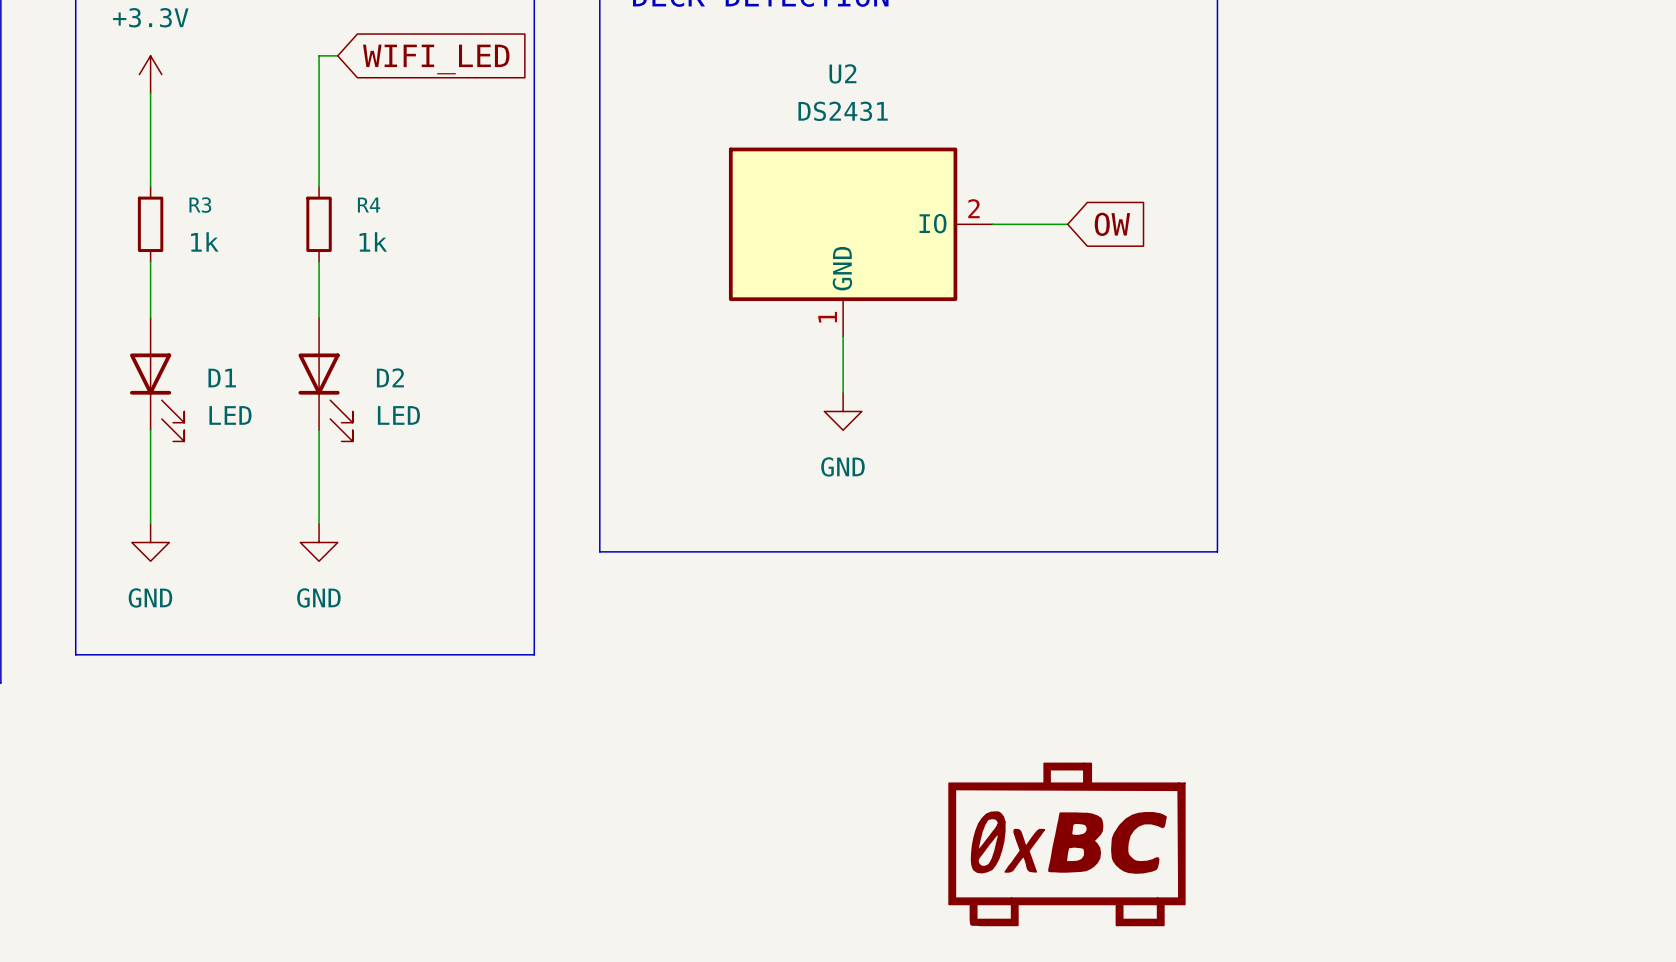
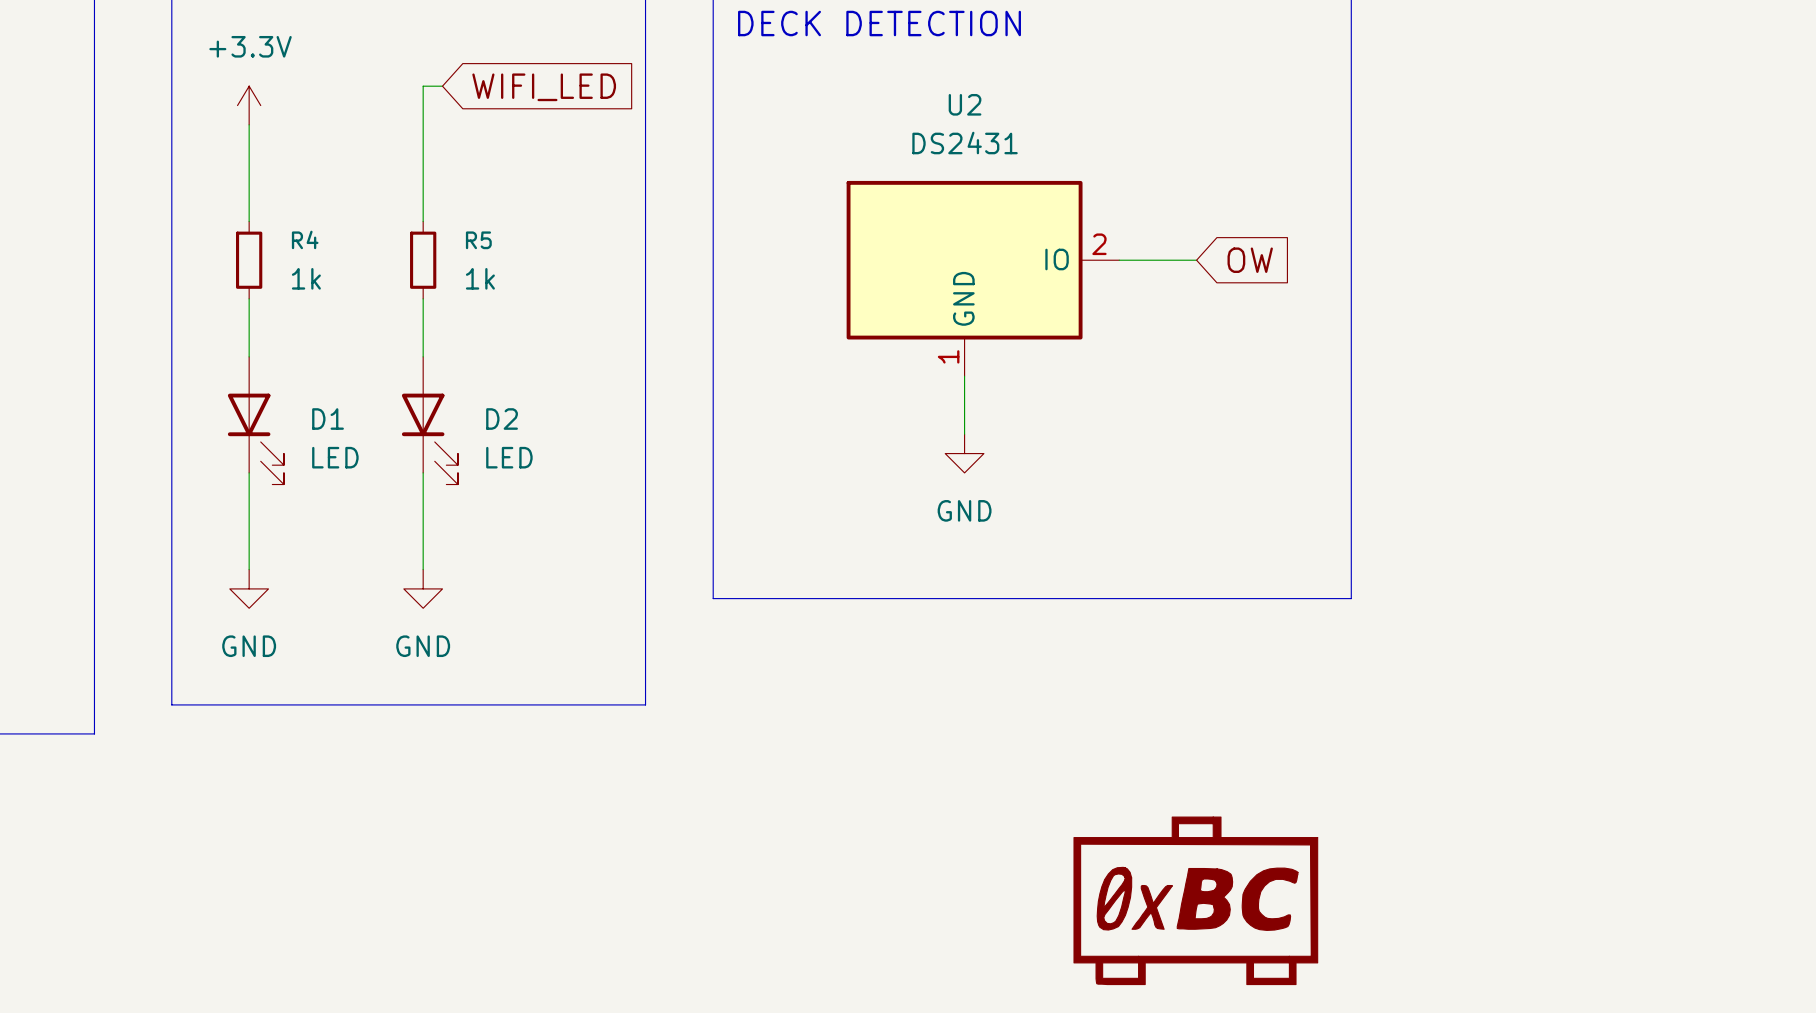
R3 name: R3 (200, 205) -> R4 (305, 239)
R4 name: R4 (369, 205) -> R5 (478, 240)

